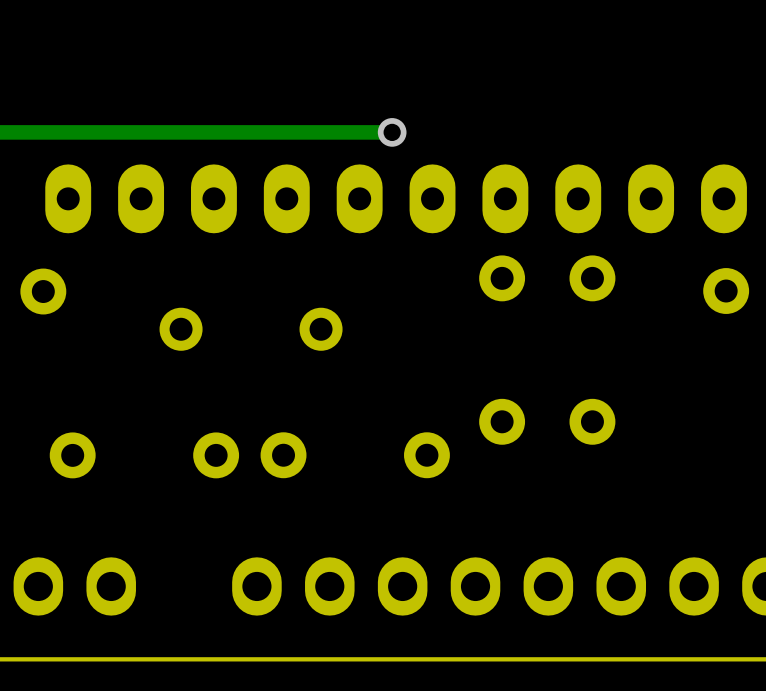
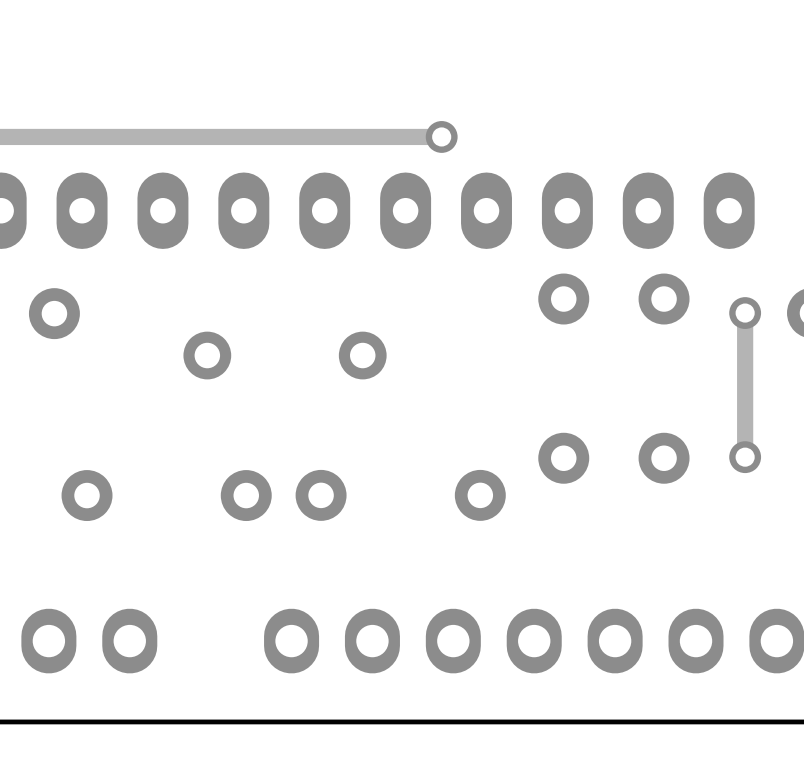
track: none -> (745, 313) (745, 457)
via: none -> (745, 313)
via: none -> (745, 457)

